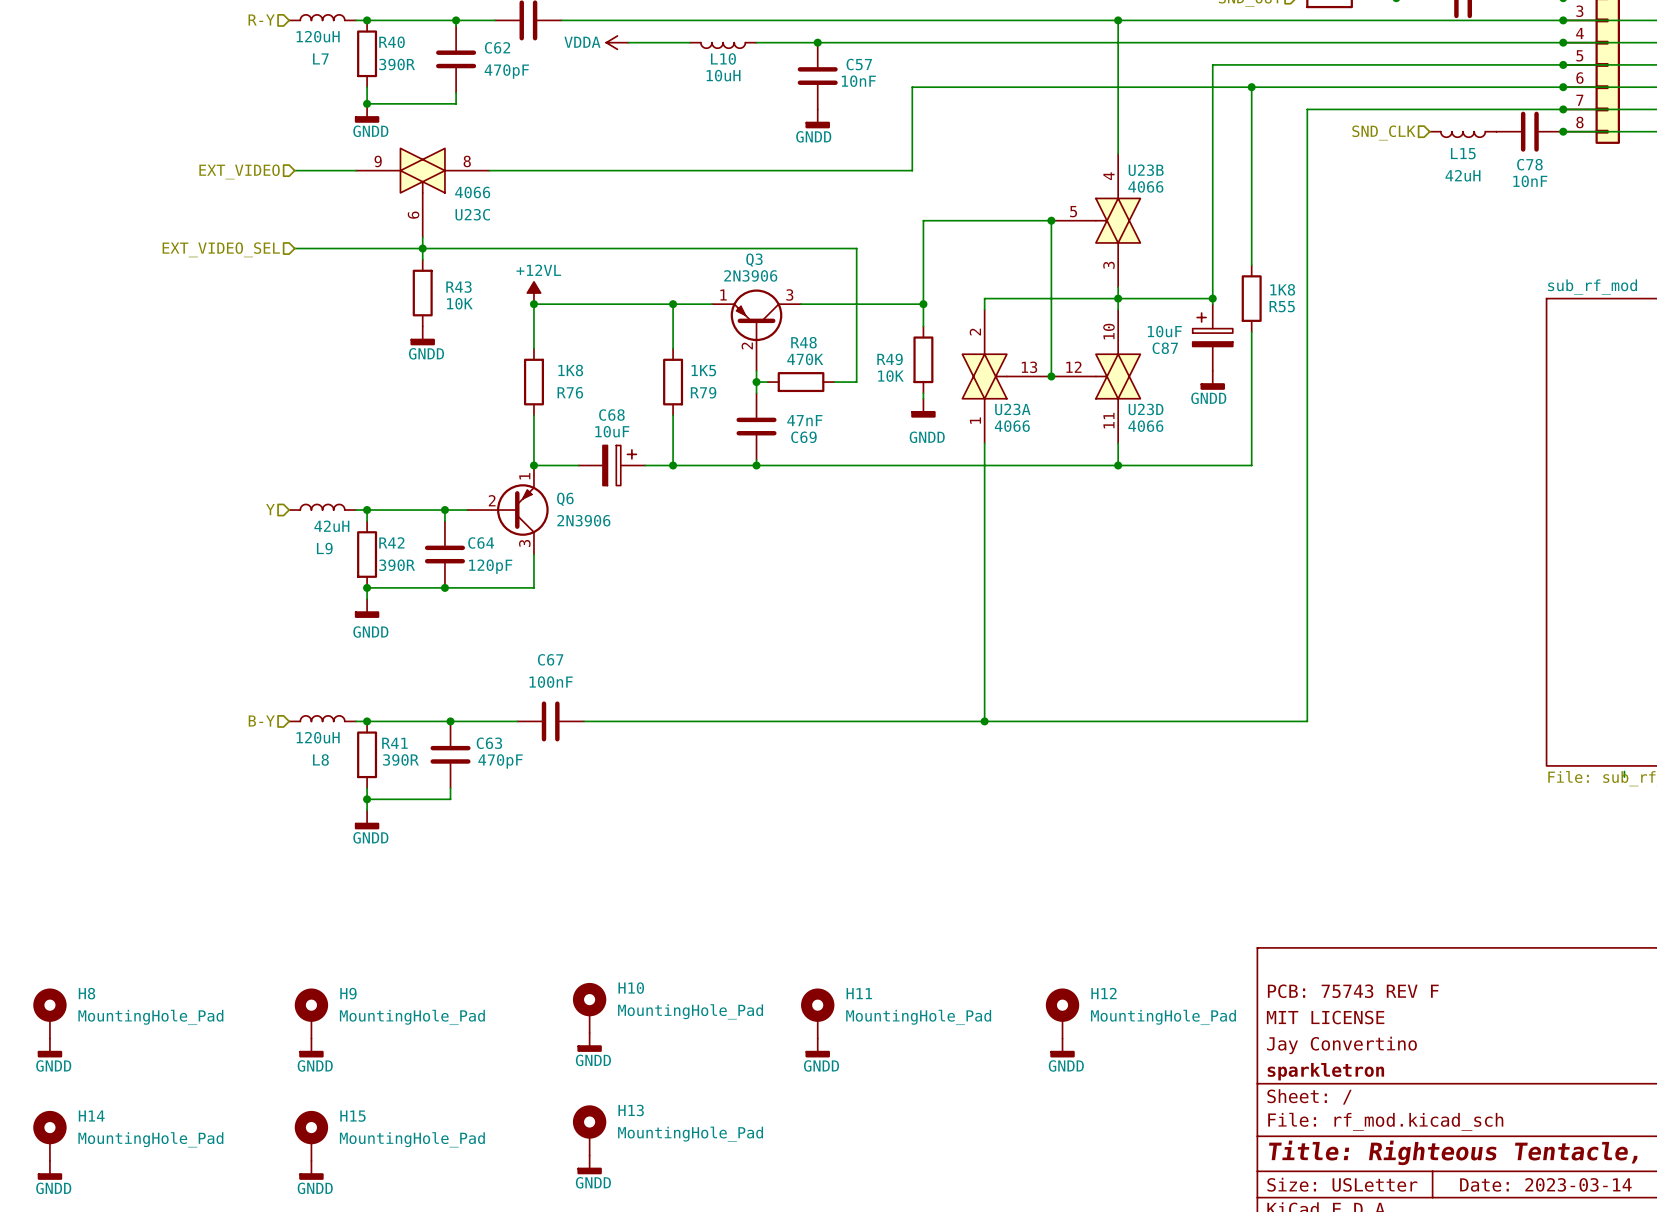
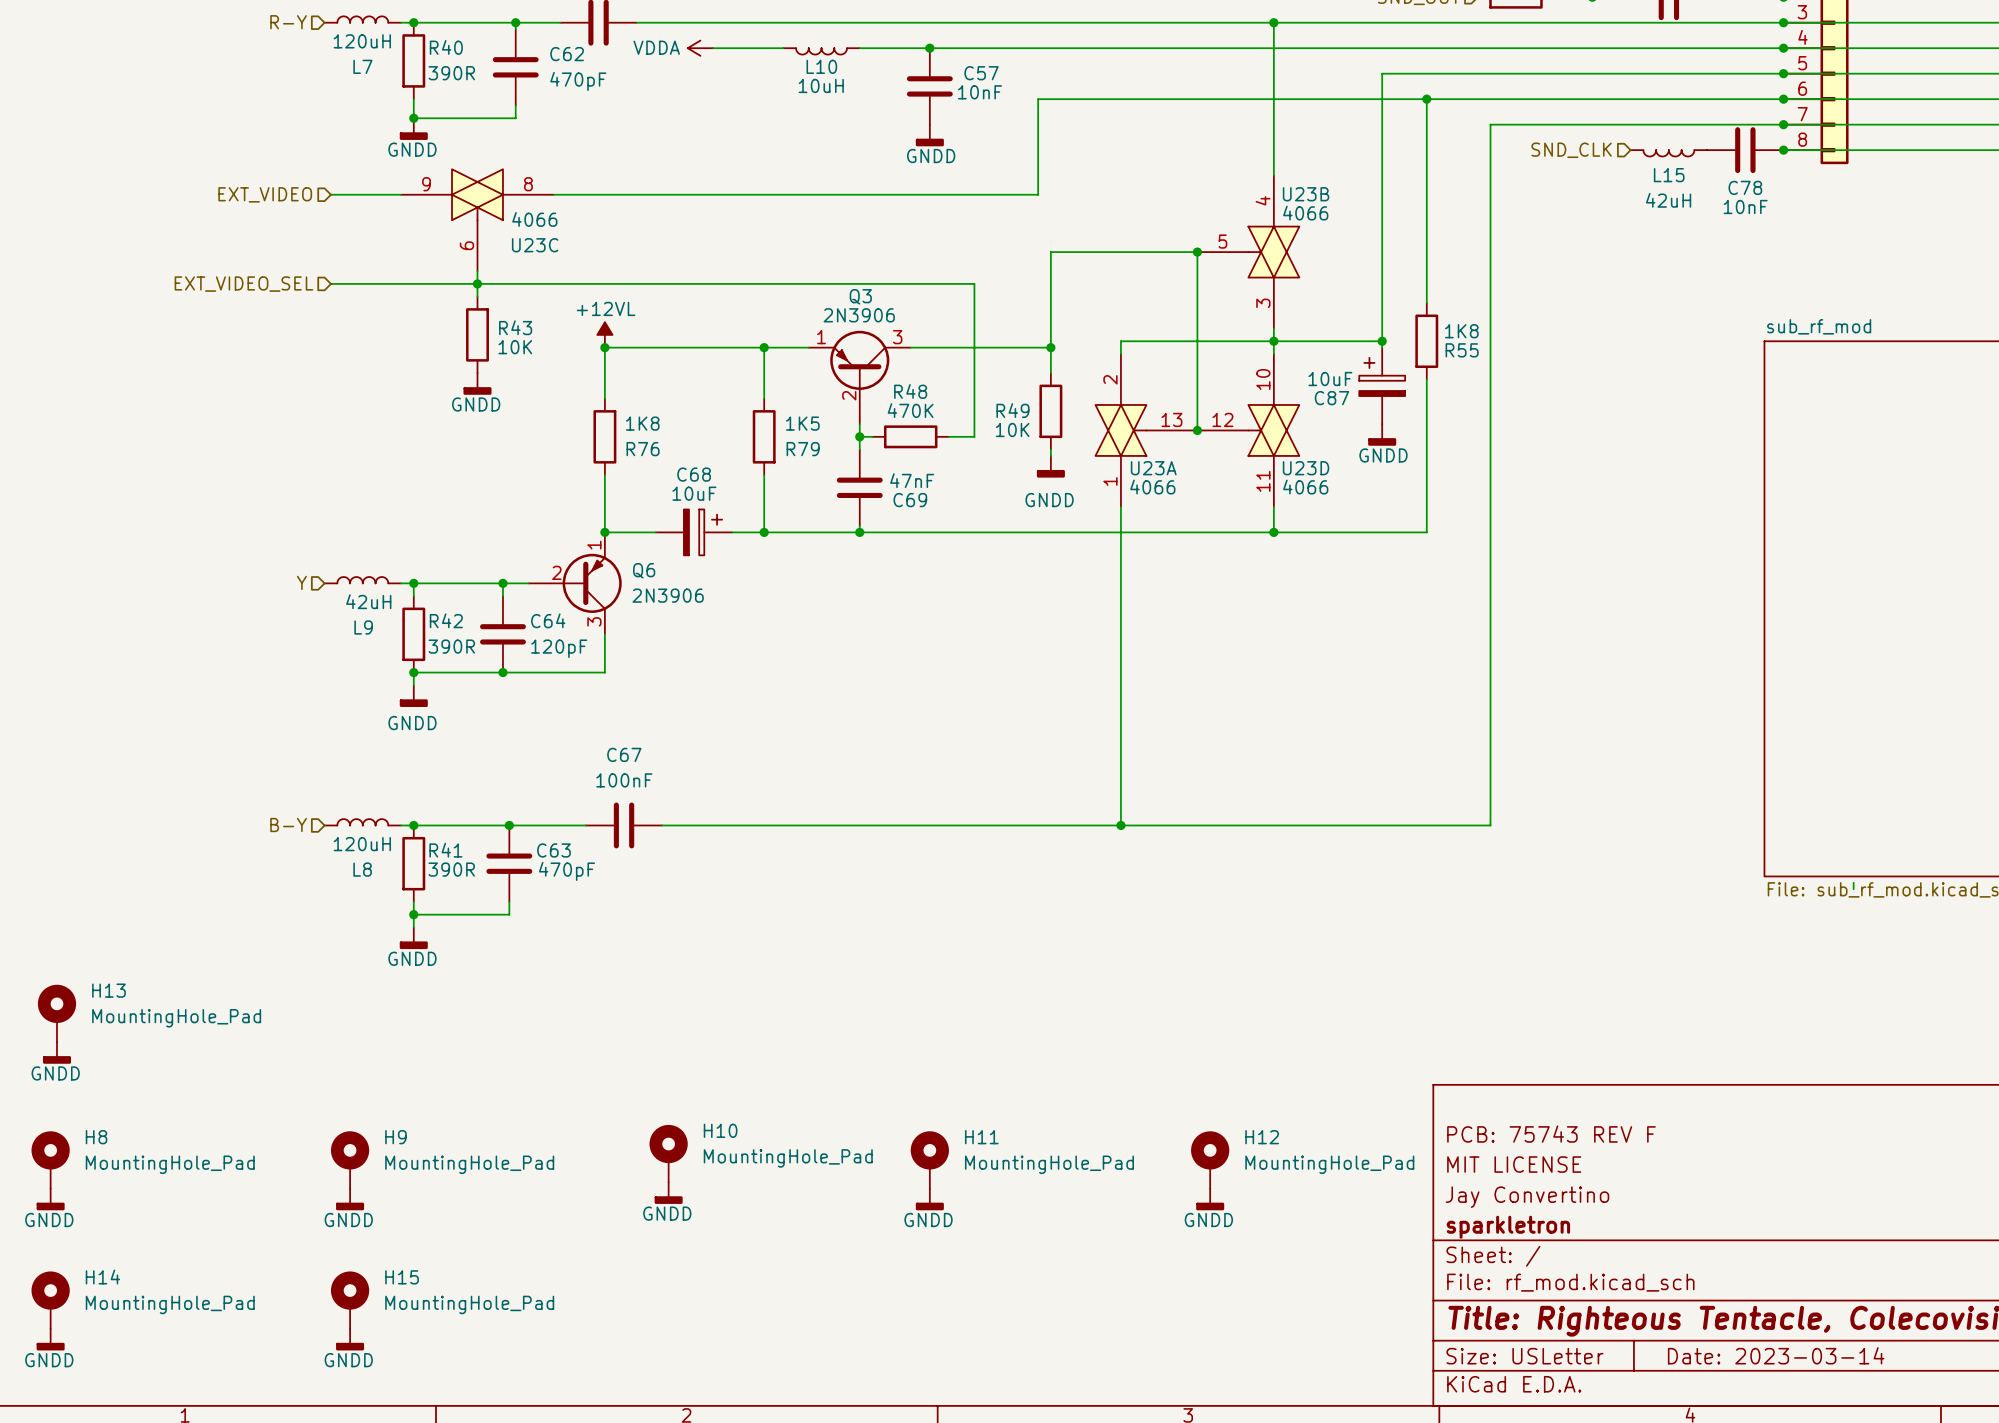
power symbol: none -> GNDD (57, 1052)
H13 position: (589, 1130) -> (57, 1013)
power symbol: GNDD (589, 1164) -> none

